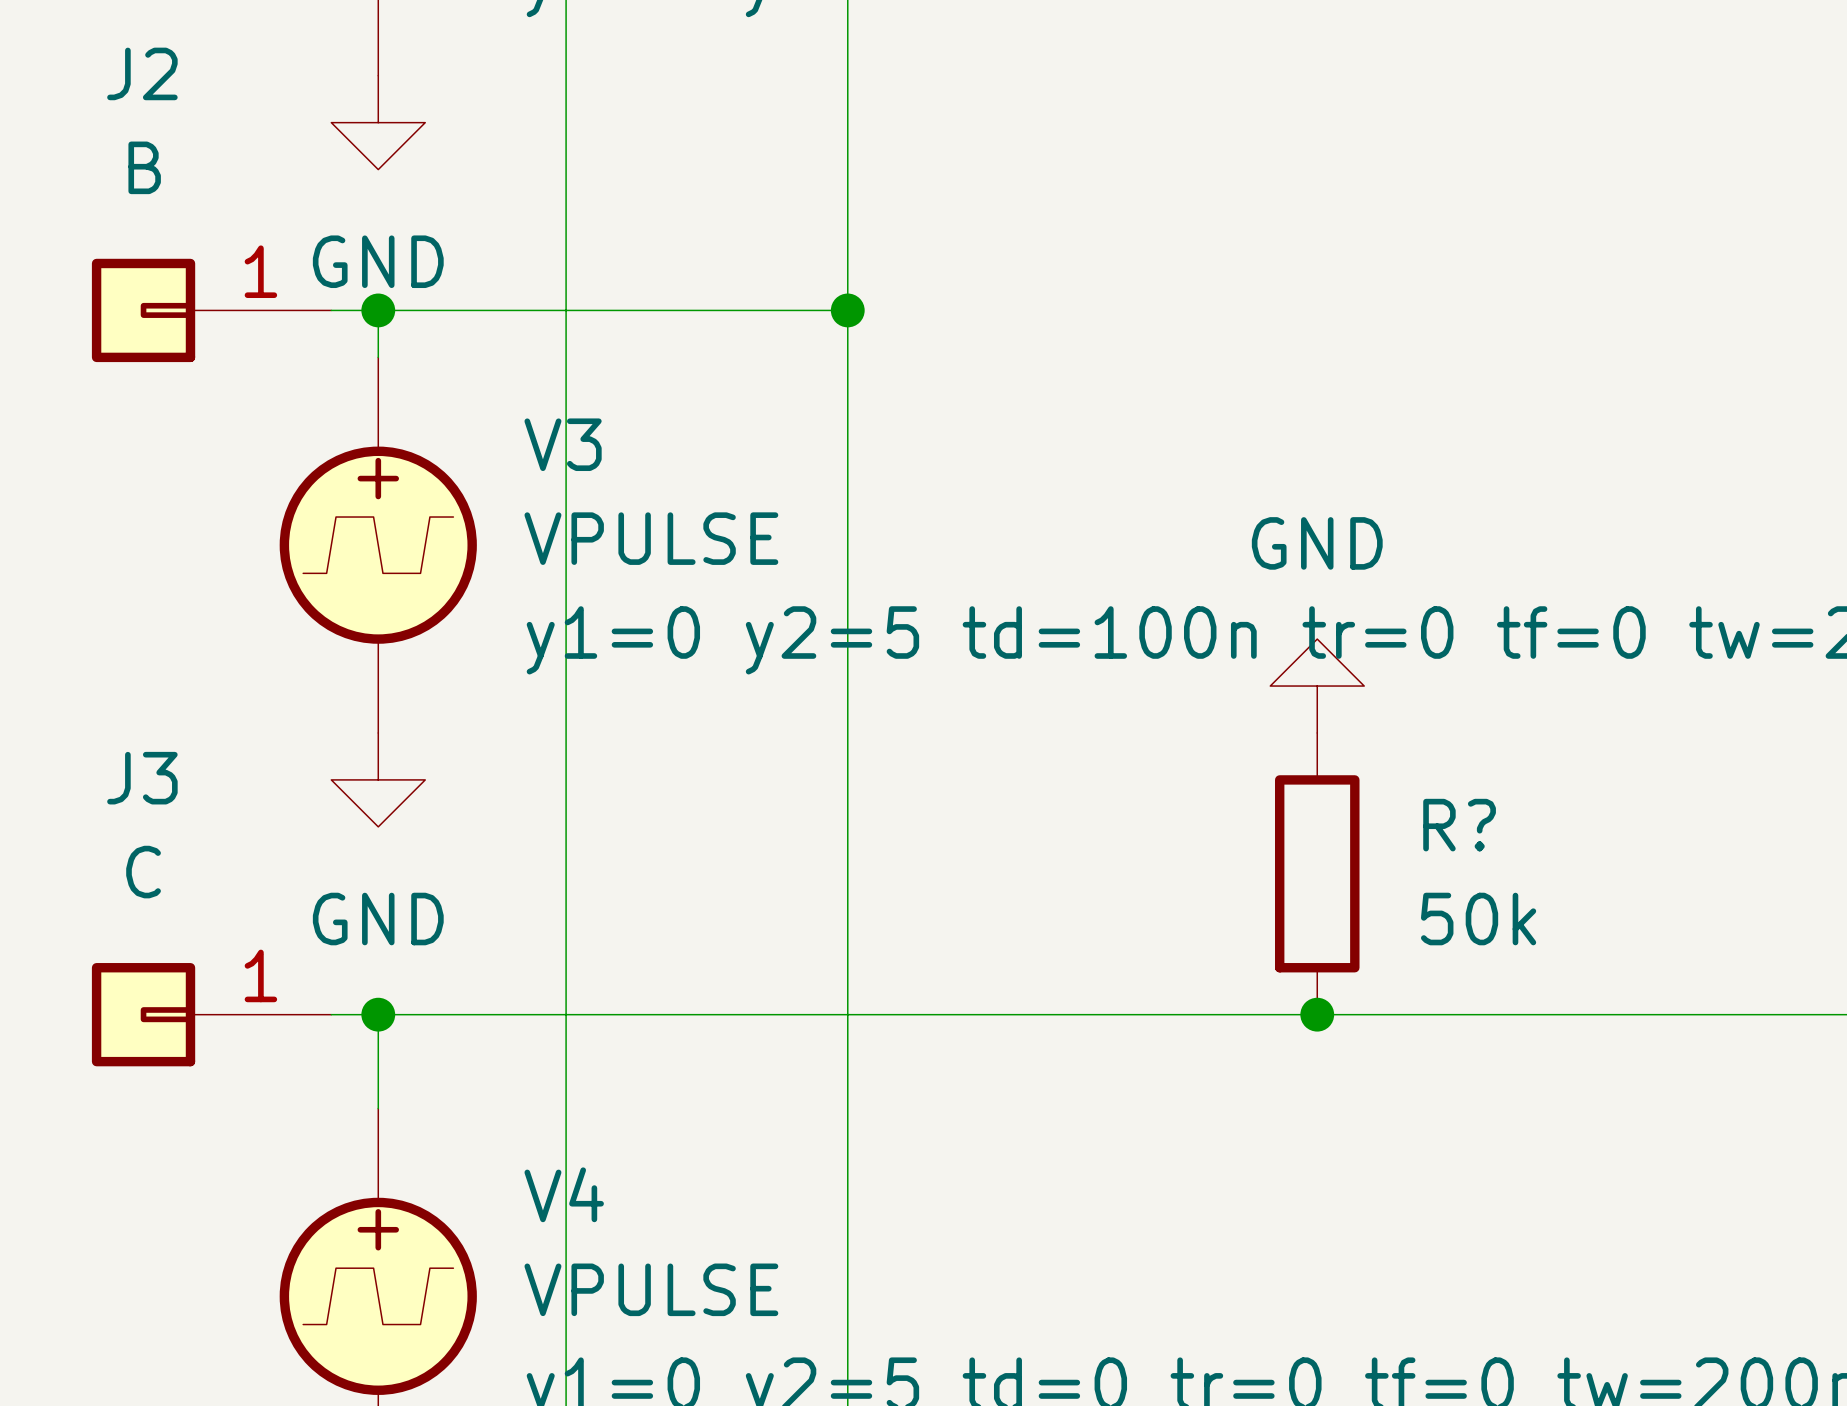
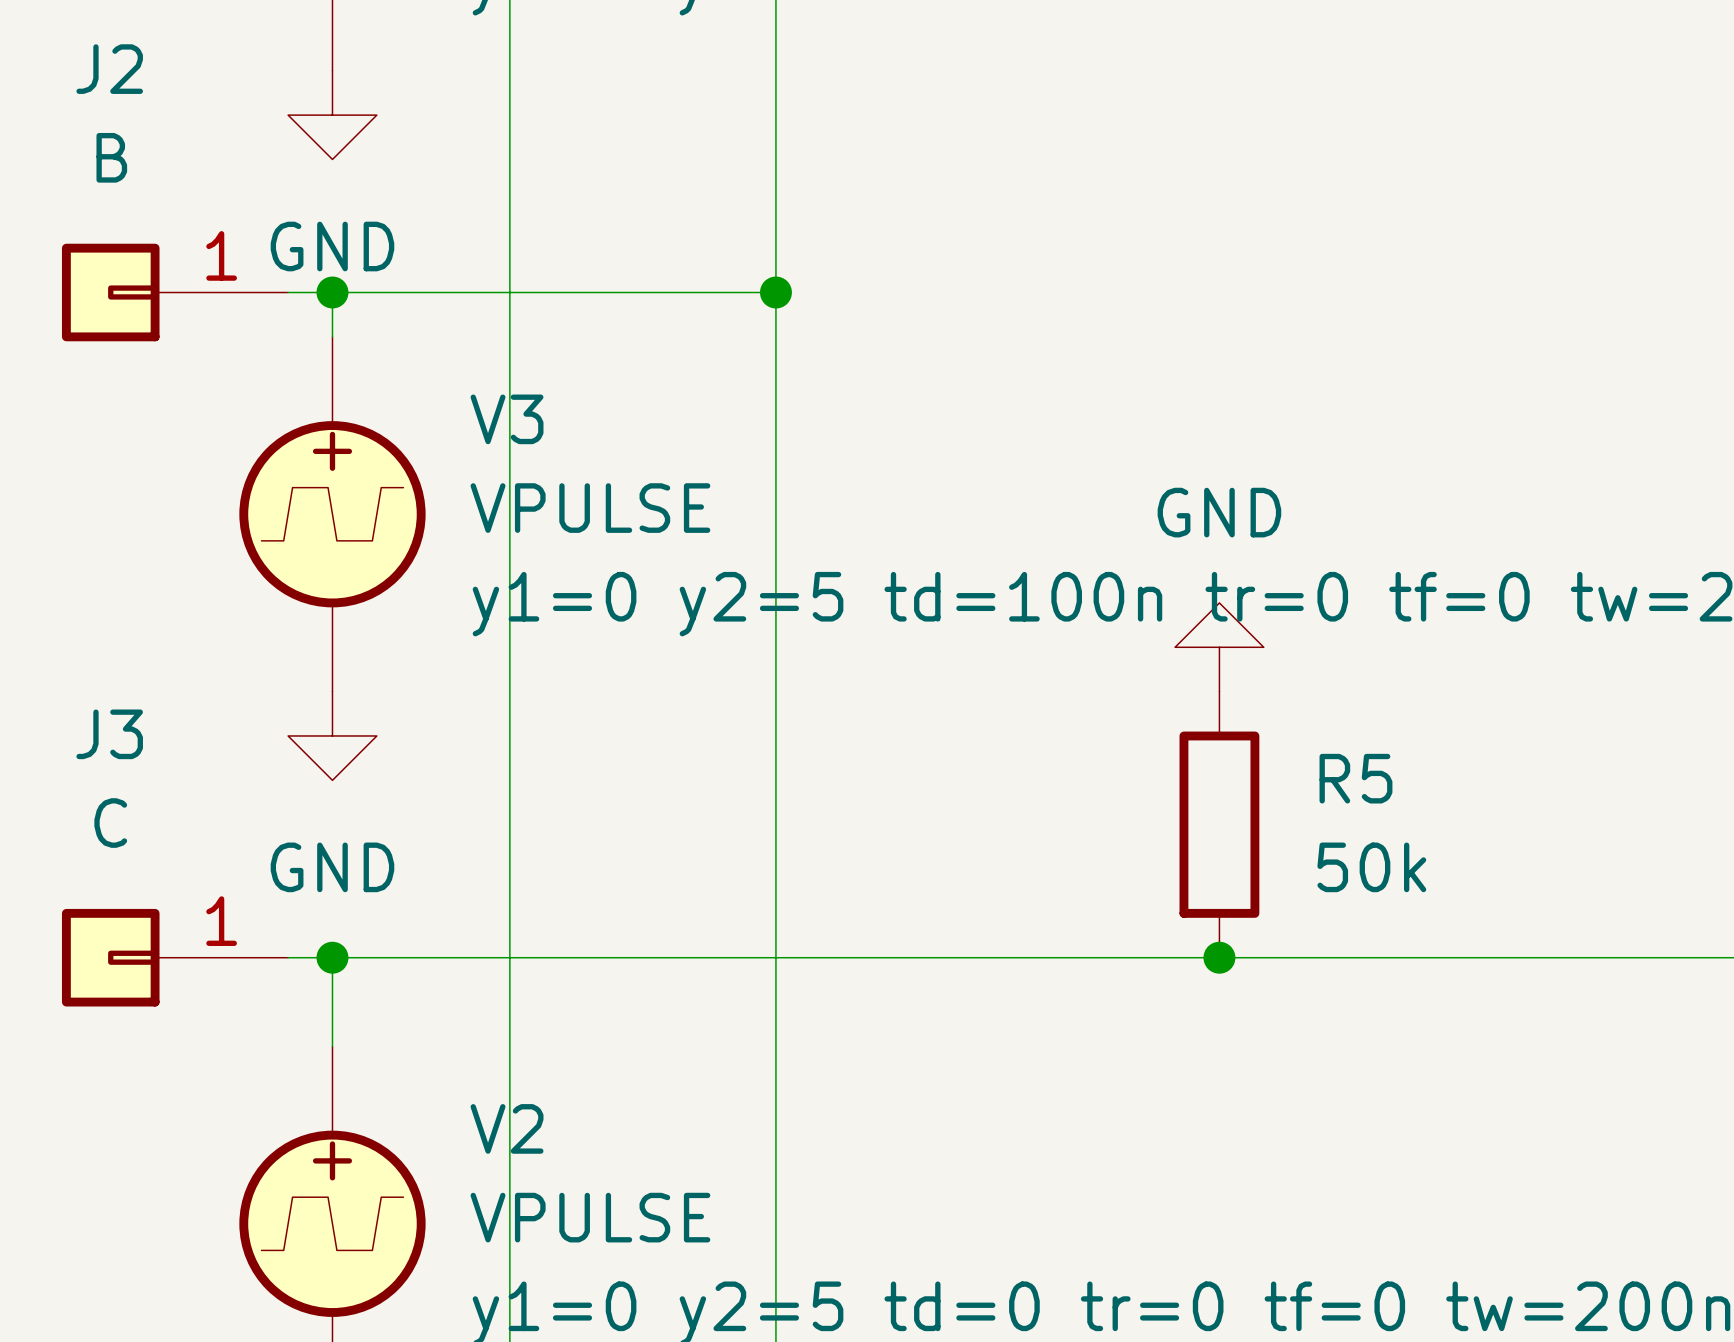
R? name: R? (1459, 825) -> R5 (1355, 778)
V4 name: V4 (564, 1194) -> V2 (507, 1128)

